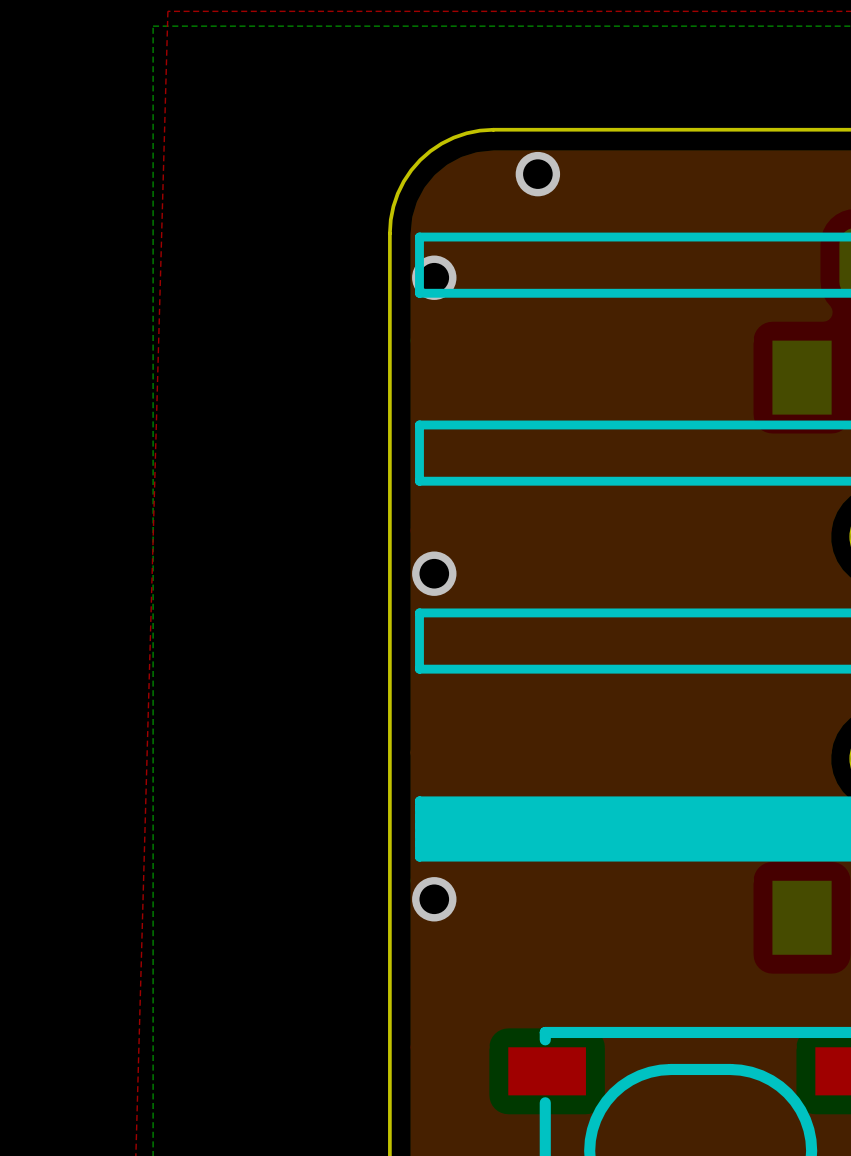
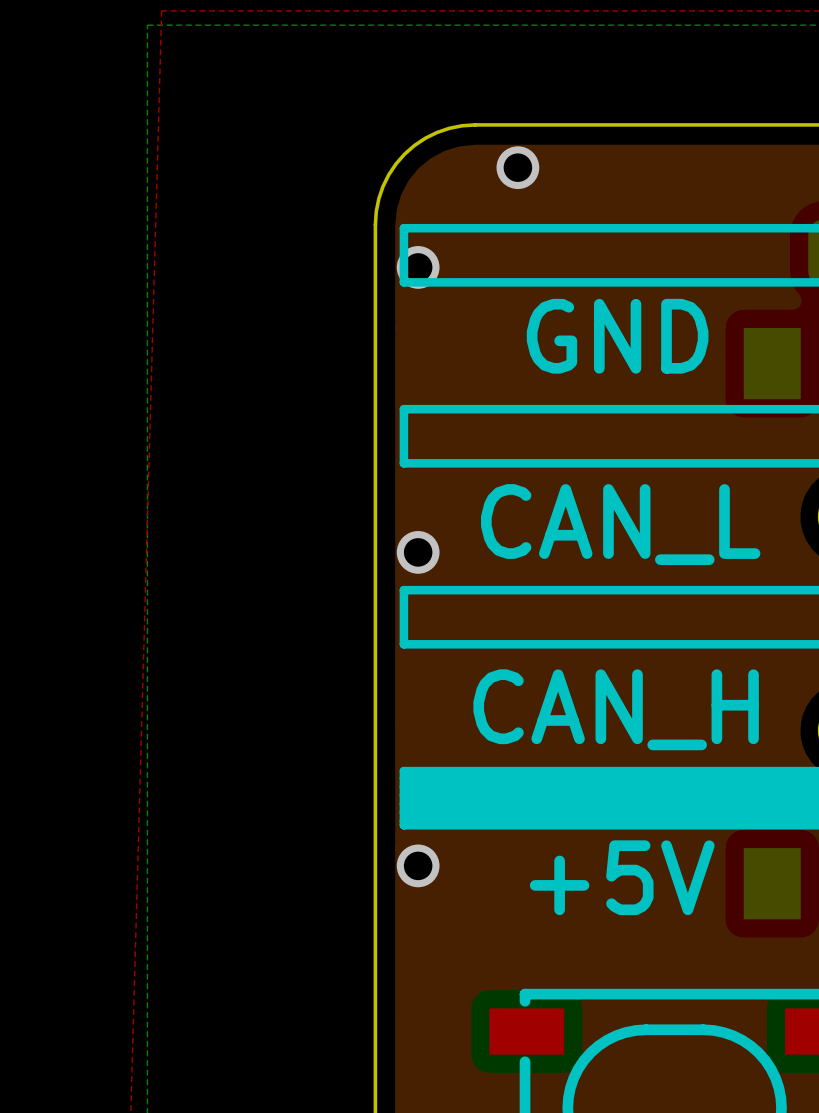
text: none -> GND (617, 336)
text: none -> CAN_L (620, 524)
text: none -> CAN_H (616, 709)
text: none -> +5V (622, 877)

